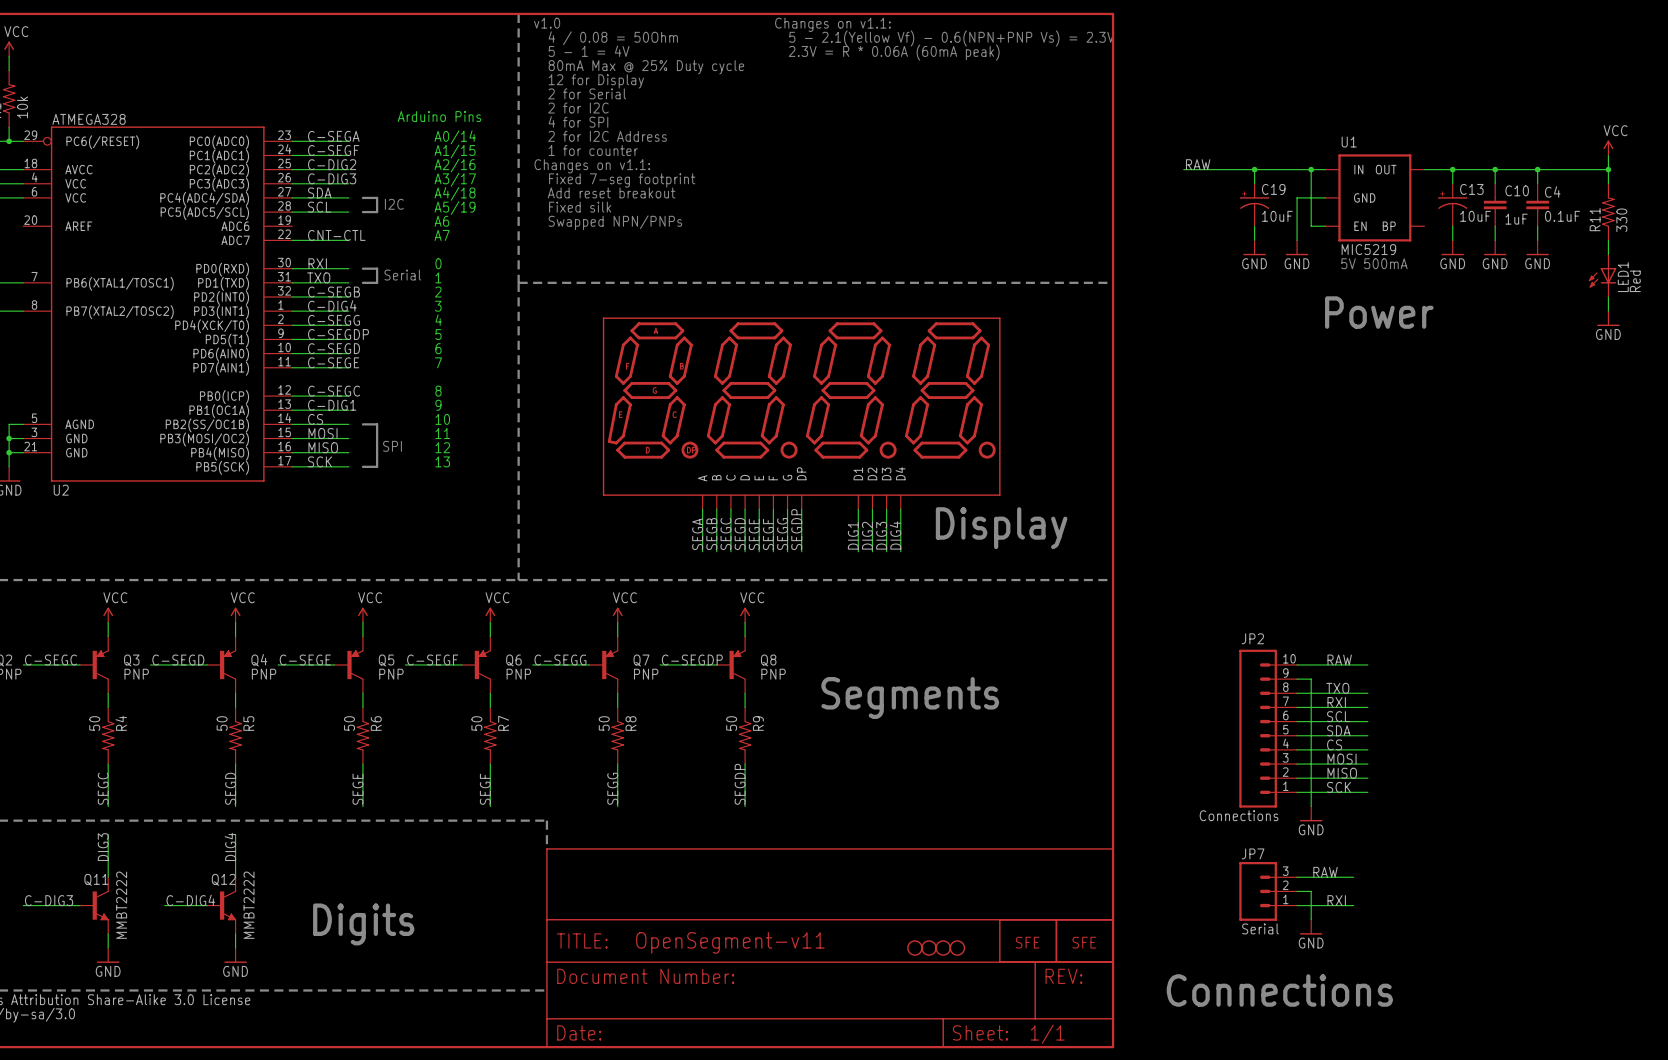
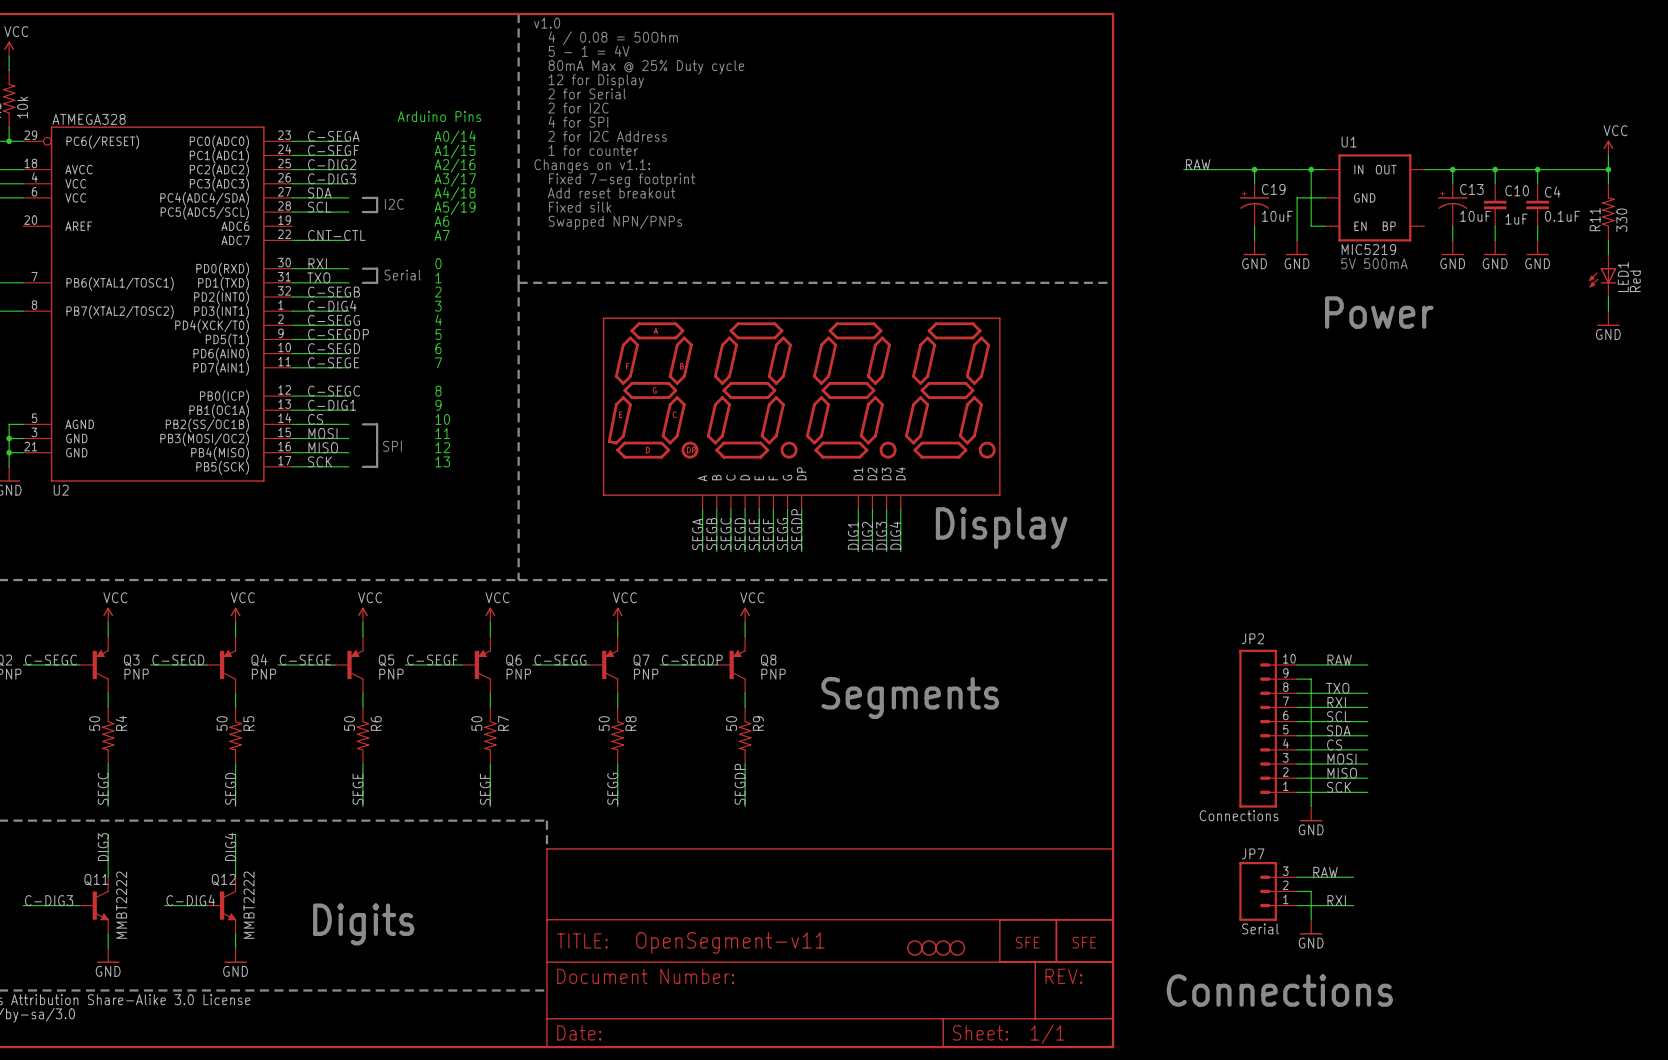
text: Changes on v1.1: (832, 24) -> none
text: 5 - 2.1(Yellow Vf) - 0.6(NPN+PNP Vs) = 2.3V (951, 38) -> none
text: 2.3V = R * 0.06A (60mA peak) (894, 52) -> none

